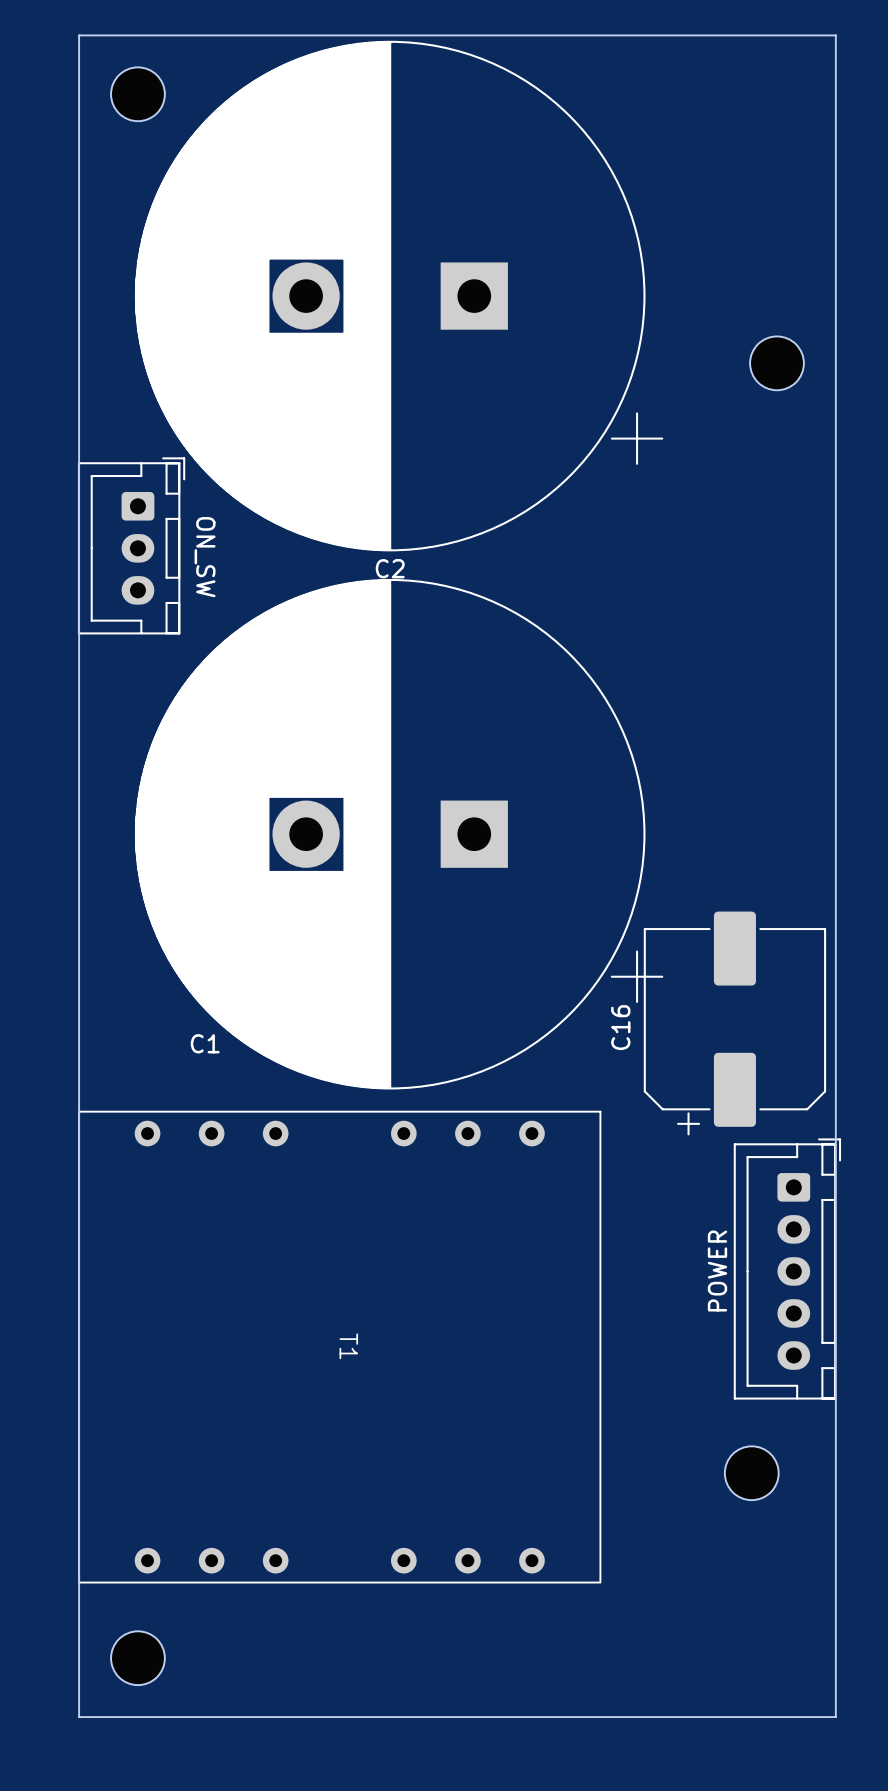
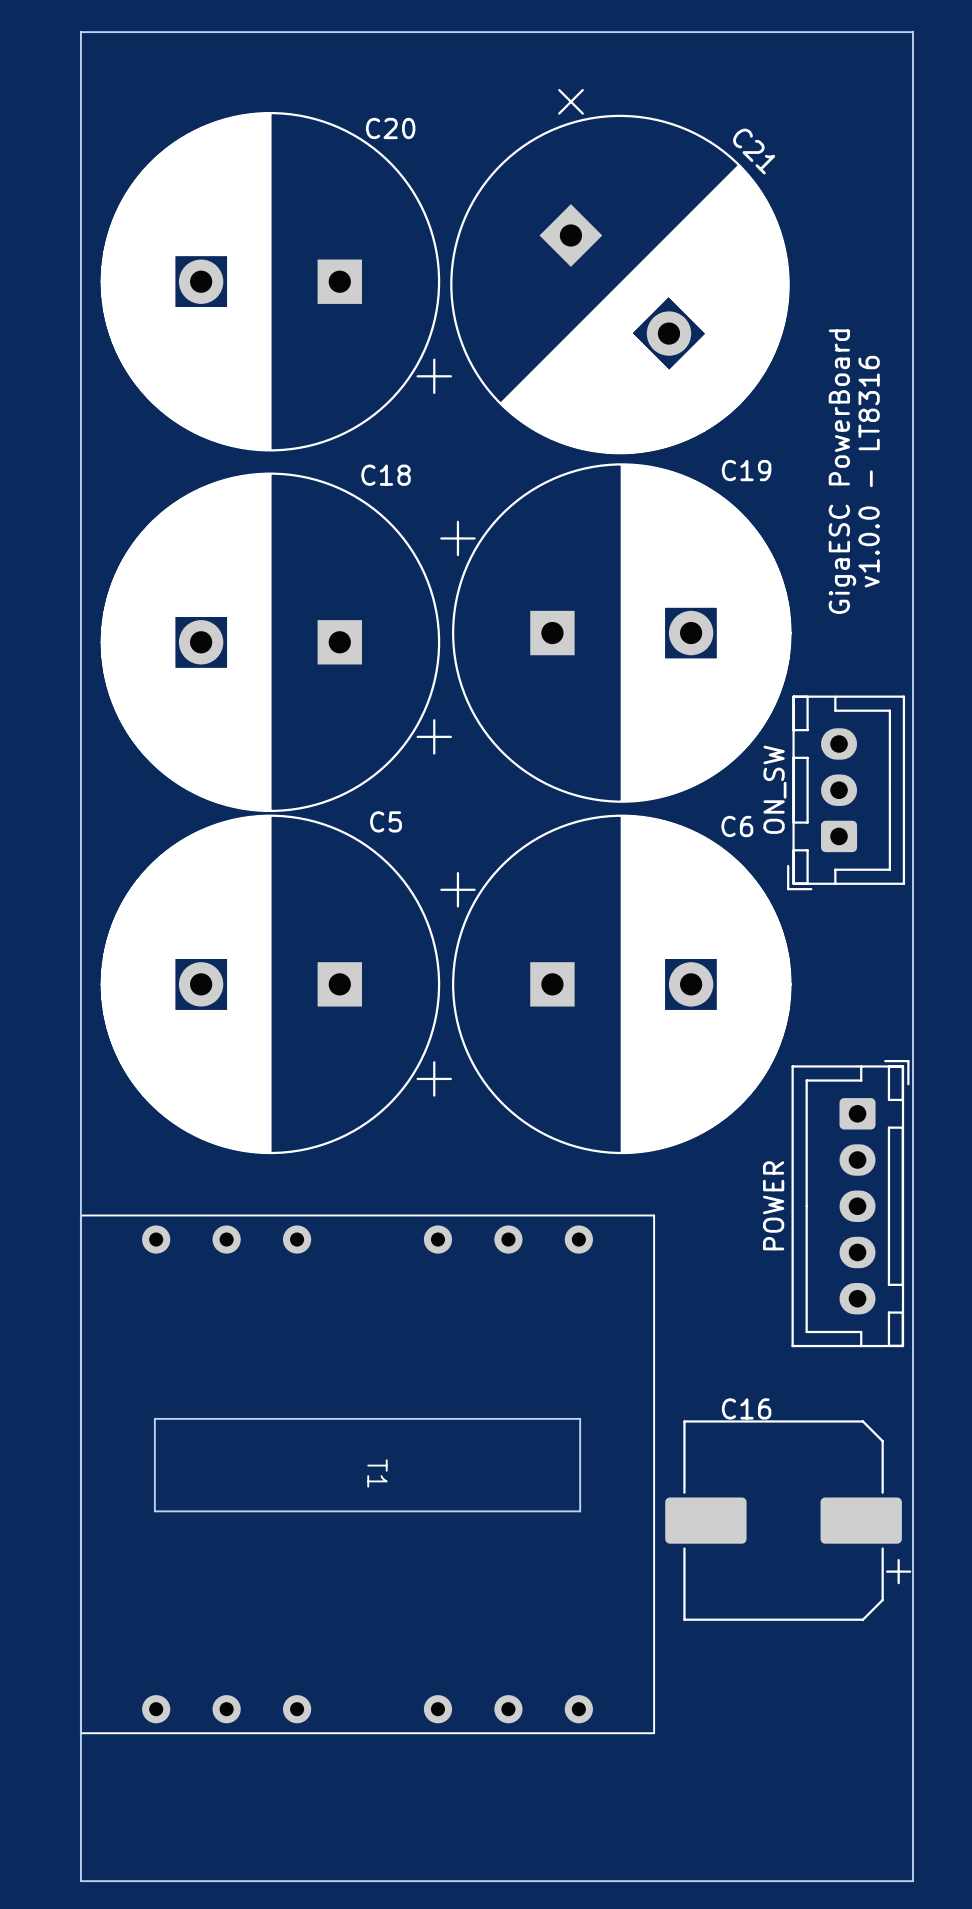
part: (137, 94) -> none
C21: none -> (619, 271)
C20: none -> (276, 281)
C2: (399, 296) -> none
part: (776, 363) -> none
text: none -> GigaESC PowerBoard (842, 471)
text: none -> v1.0.0 - LT8316 (869, 471)
part: (131, 545) -> none
C19: none -> (615, 633)
C18: none -> (276, 642)
part: none -> (846, 792)
C1: (399, 834) -> none
C5: none -> (276, 984)
C6: none -> (615, 984)
C16 rotation: 0° (734, 1023) -> 90° counterclockwise (788, 1520)
C16 position: (734, 1023) -> (788, 1520)
C16 name position: C16 (620, 1027) -> C16 (746, 1408)
part position: (787, 1268) -> (850, 1203)
board edge: none -> (154, 1418) (580, 1418) (580, 1511) (154, 1511) (154, 1418)
part: (751, 1473) -> none
part: (137, 1658) -> none

